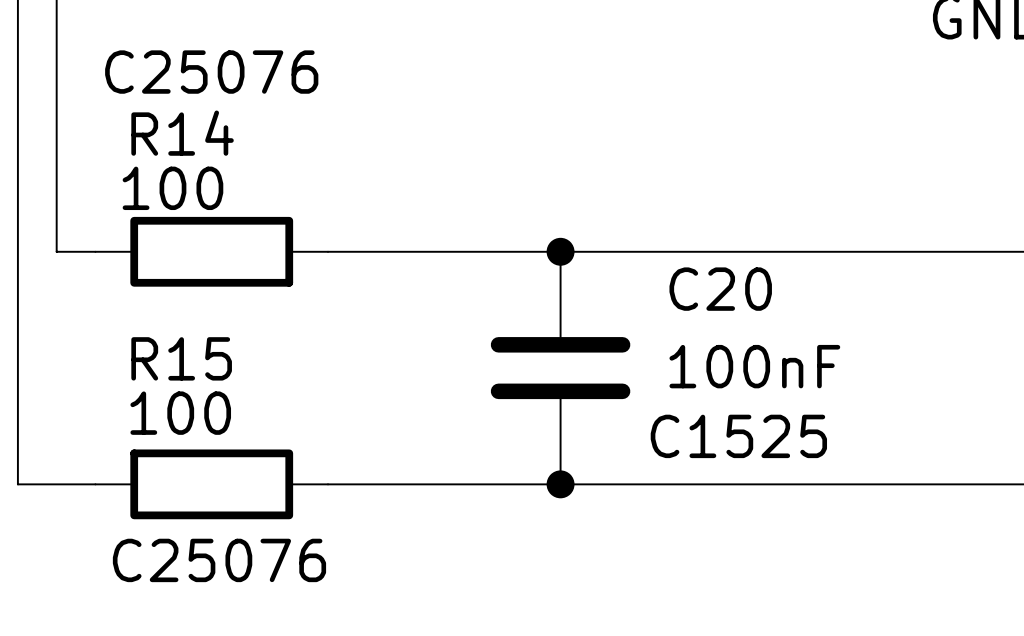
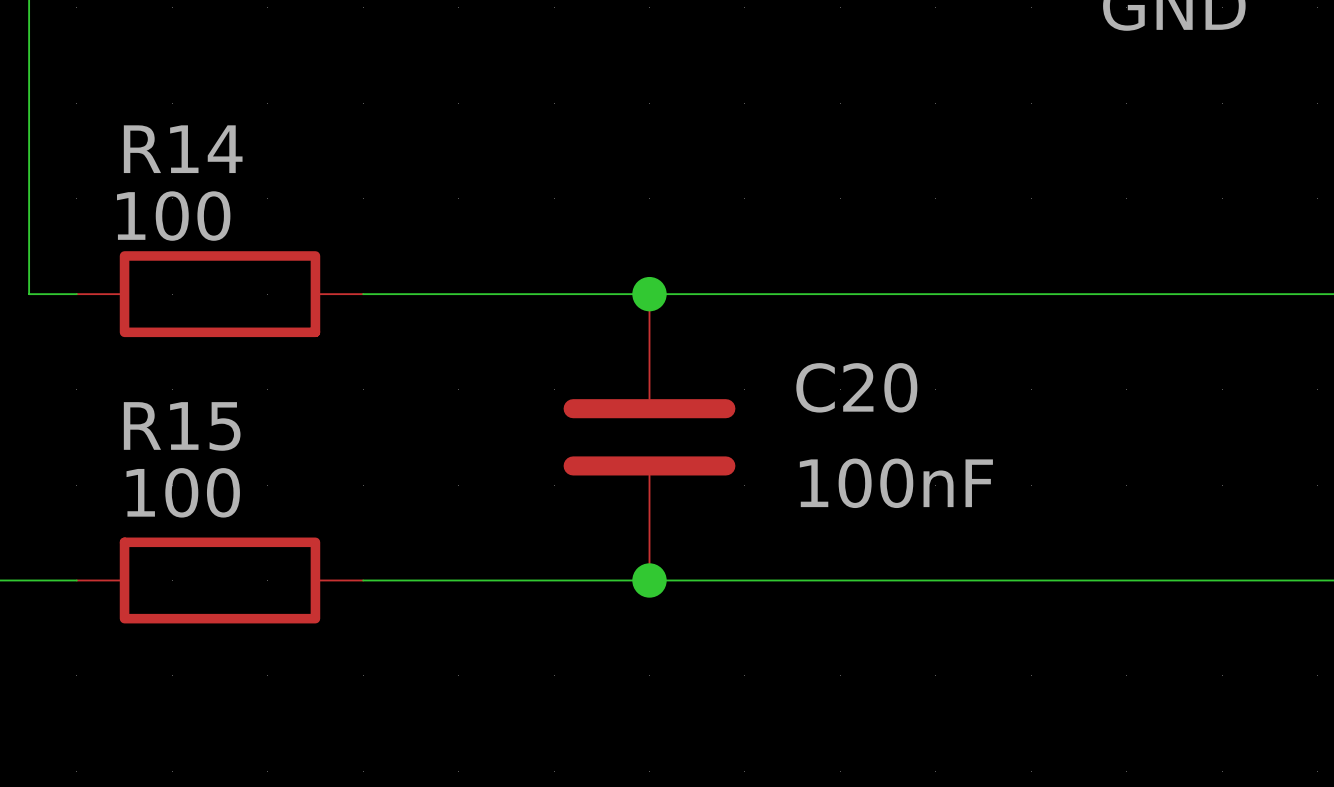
R14 text: C25076 (211, 72) -> none
C20 name position: C20 (720, 289) -> C20 (856, 387)
C20 value position: 100nF (754, 366) -> 100nF (896, 483)
C20 text: C1525 (738, 436) -> none
R15 text: C25076 (219, 560) -> none

